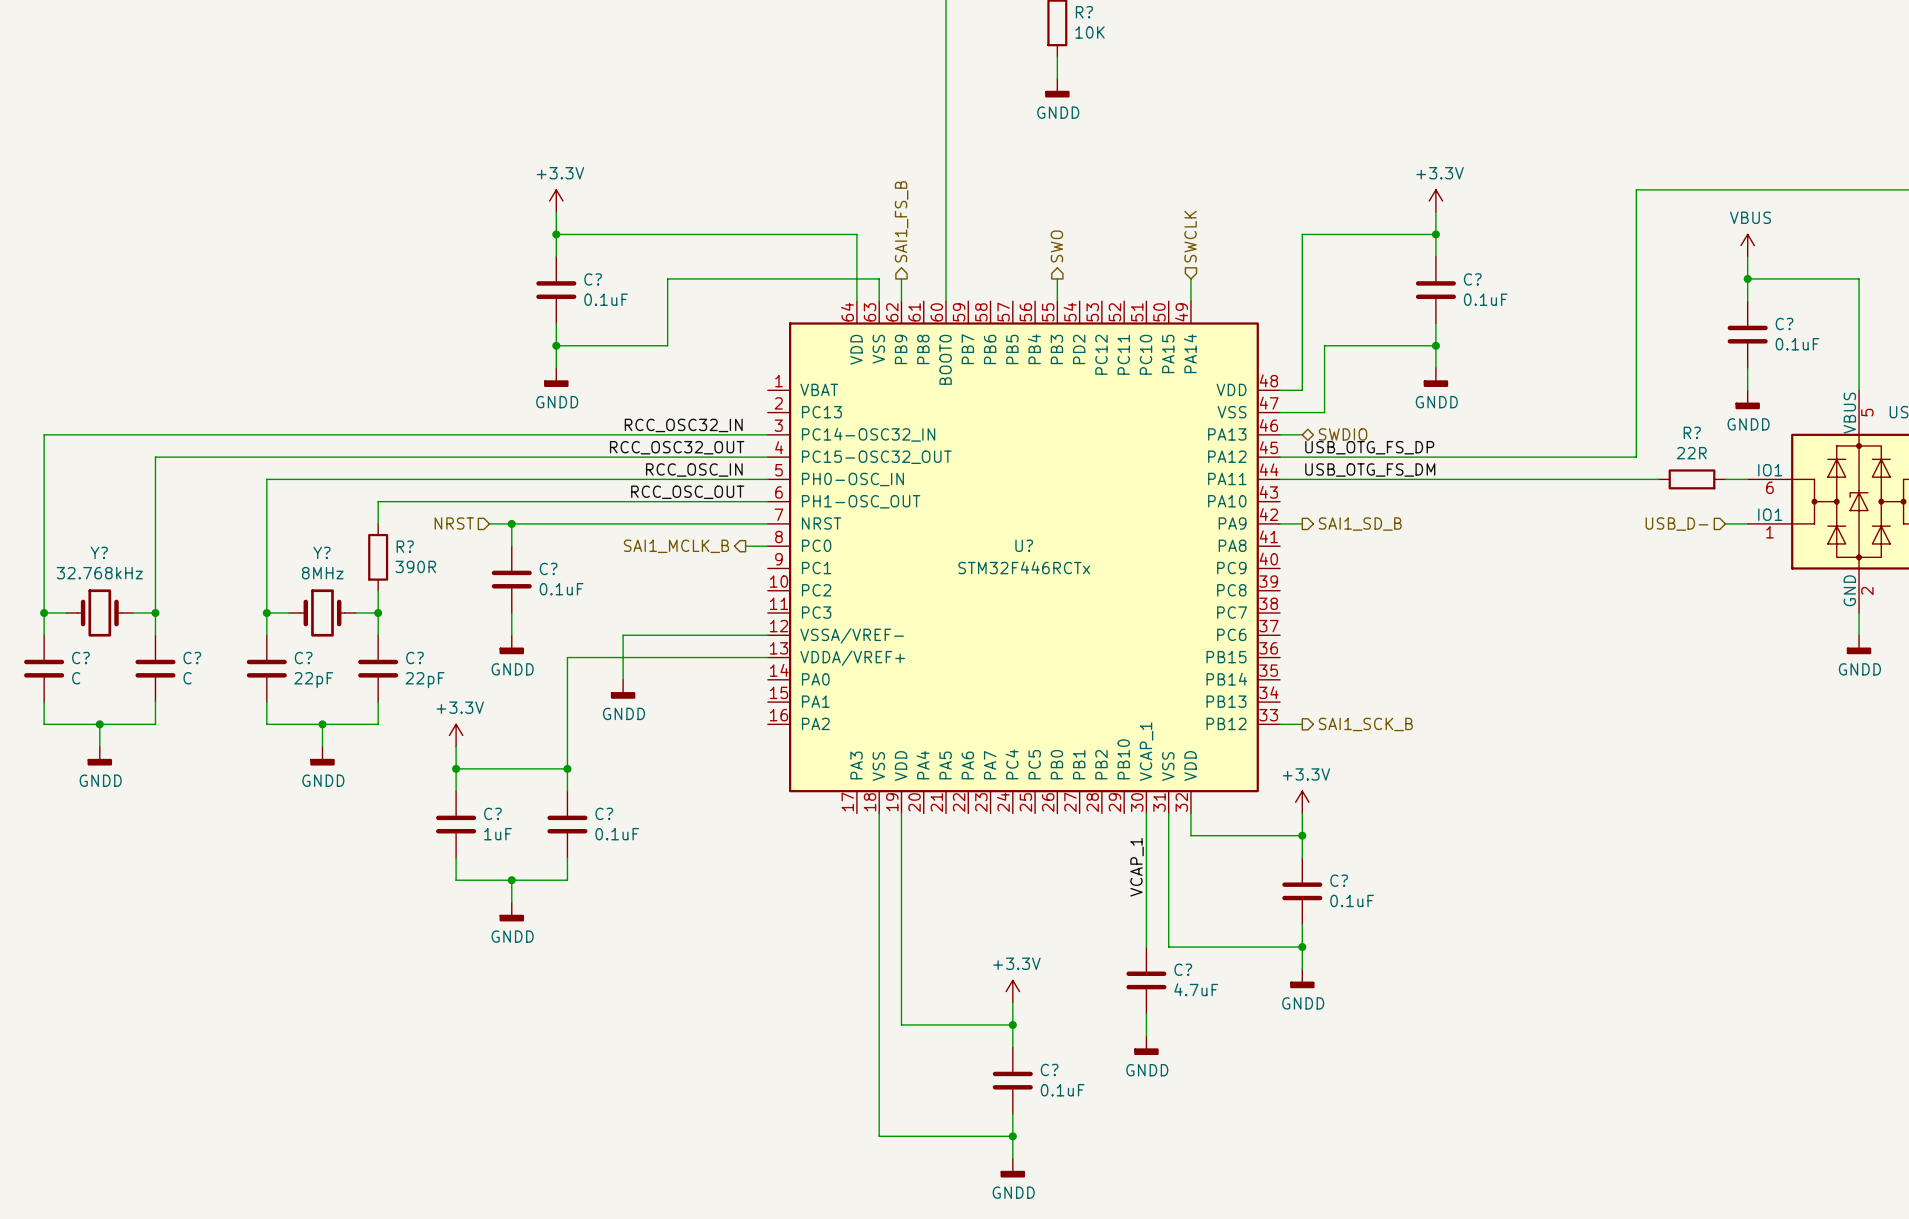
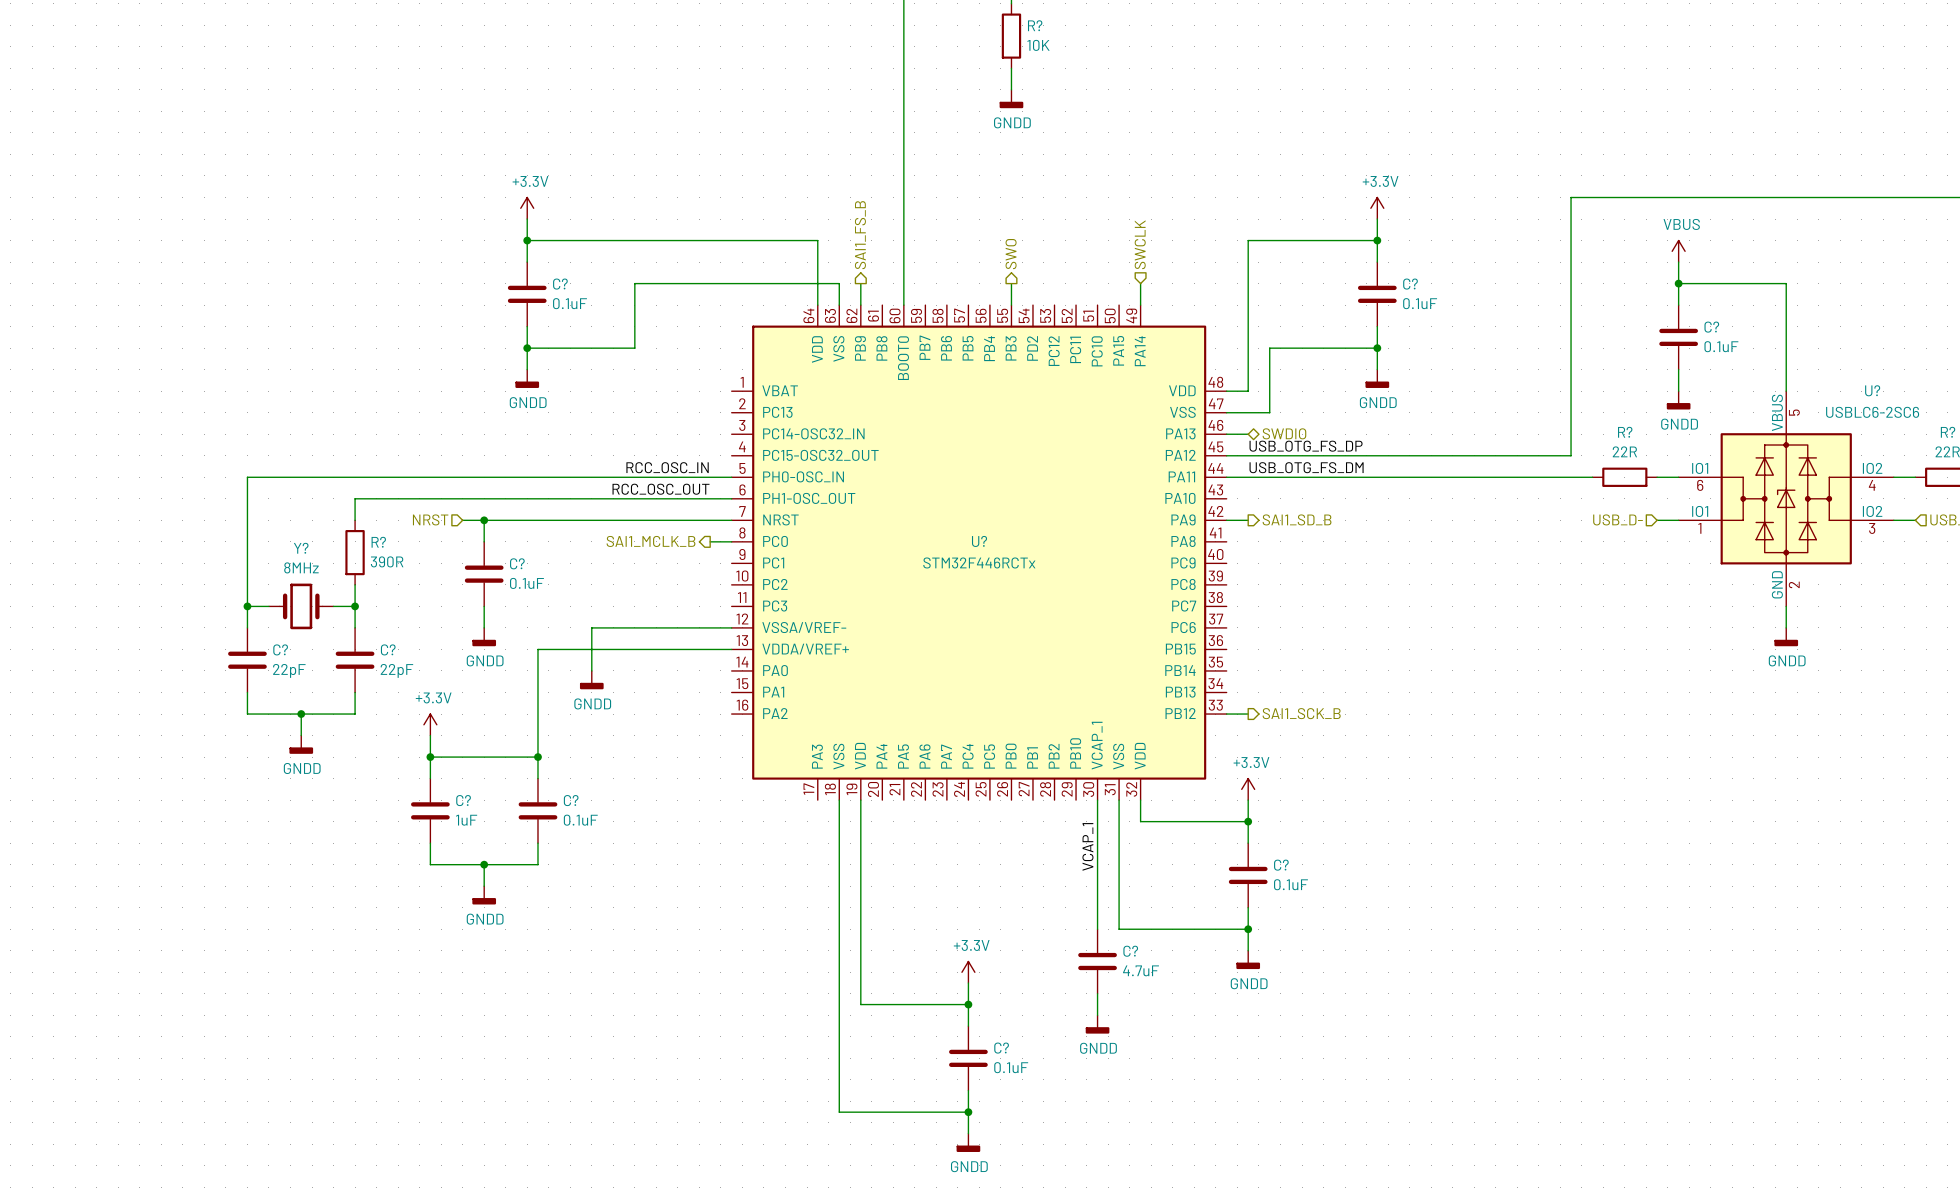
label: RCC_OSC32_IN (683, 425) -> none
wire: (767, 434) (44, 434) (44, 635) -> none
label: RCC_OSC32_OUT (677, 447) -> none
wire: (767, 457) (155, 457) (155, 635) -> none
wire: (44, 613) (66, 613) -> none
junction: (44, 613) -> none
Y?: 32.768kHz (99, 613) -> none
wire: (133, 613) (155, 613) -> none
junction: (155, 613) -> none
C?: C (44, 668) -> none
C?: C (155, 668) -> none
wire: (44, 702) (44, 724) (155, 724) (155, 702) -> none
wire: (99, 724) (99, 746) -> none
junction: (99, 724) -> none
power symbol: GNDD (99, 756) -> none

